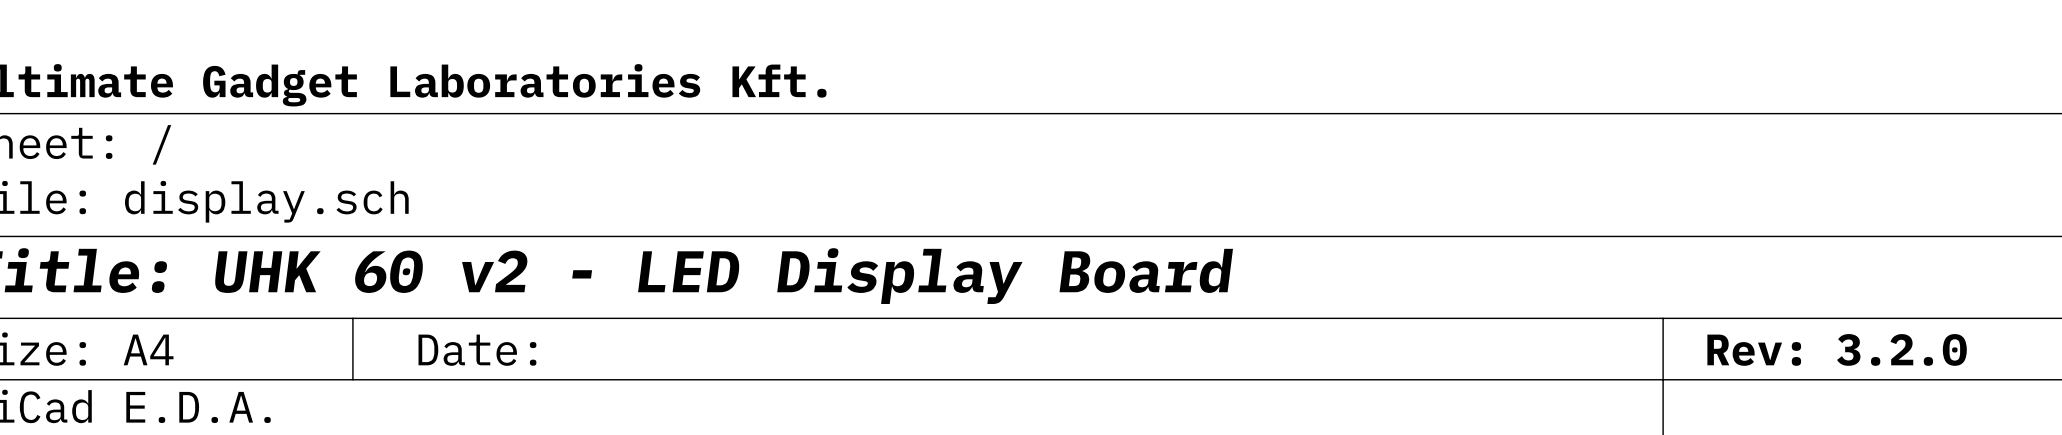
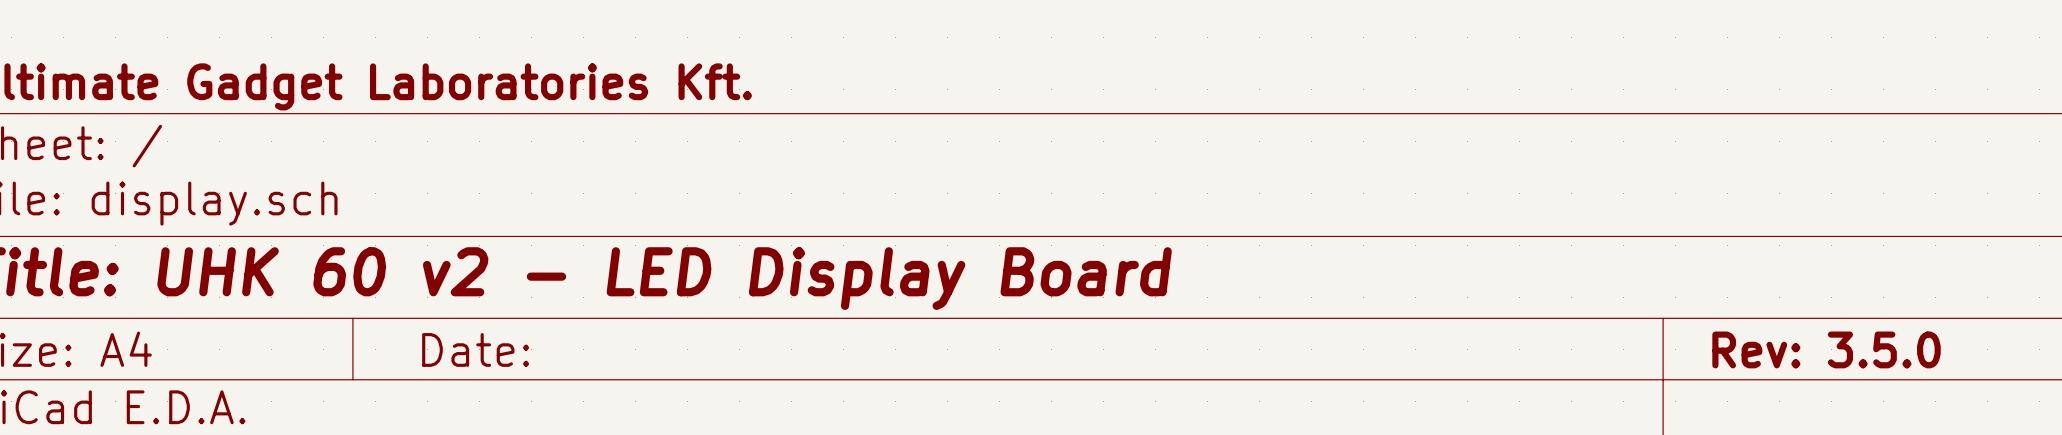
title block: Rev: 3.2.0 (1837, 349) -> Rev: 3.5.0 (1826, 349)

